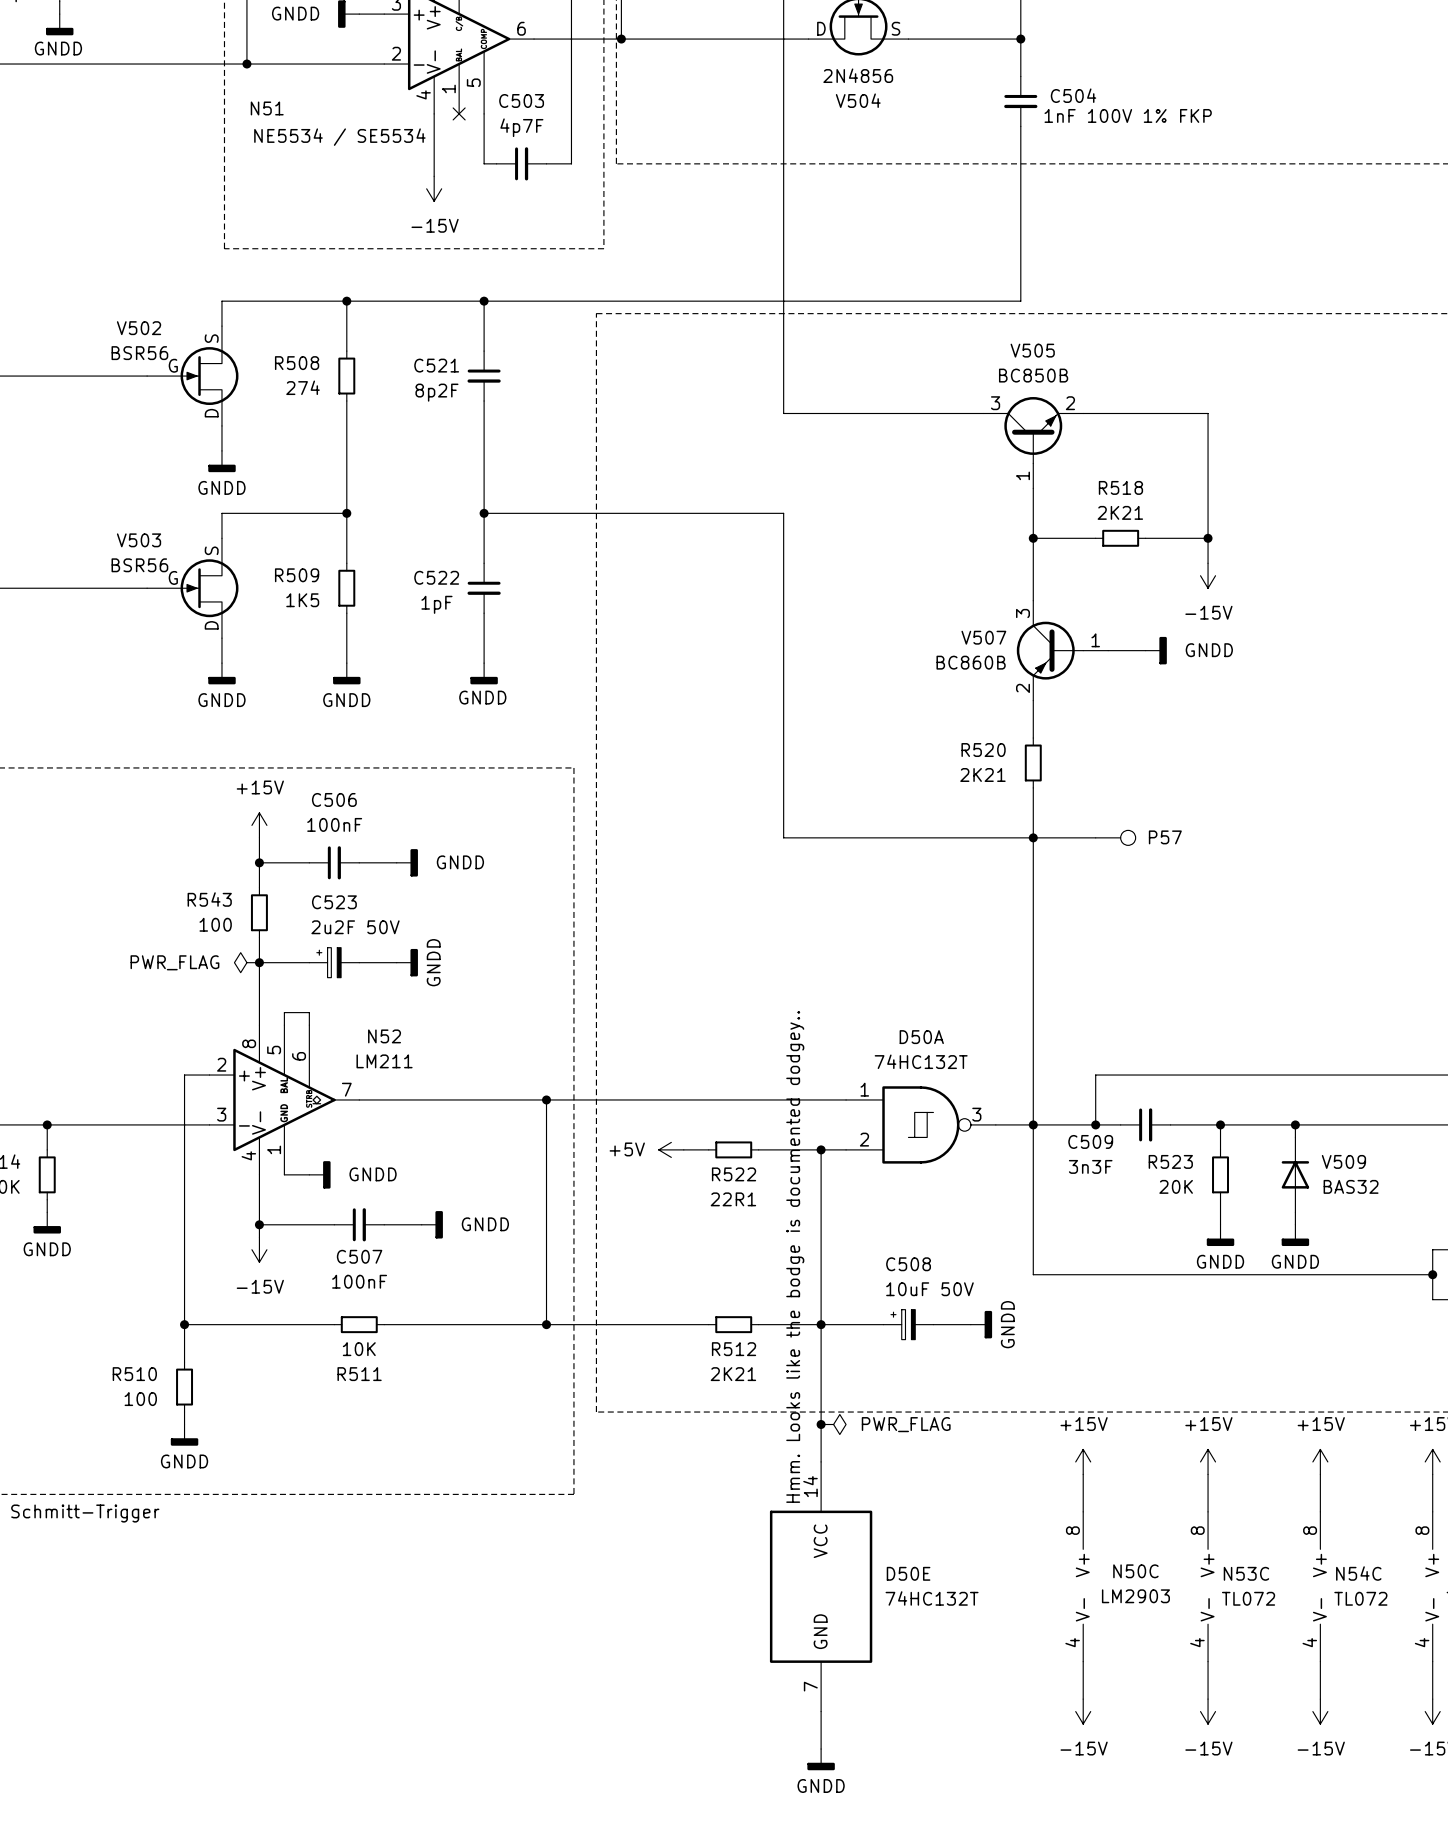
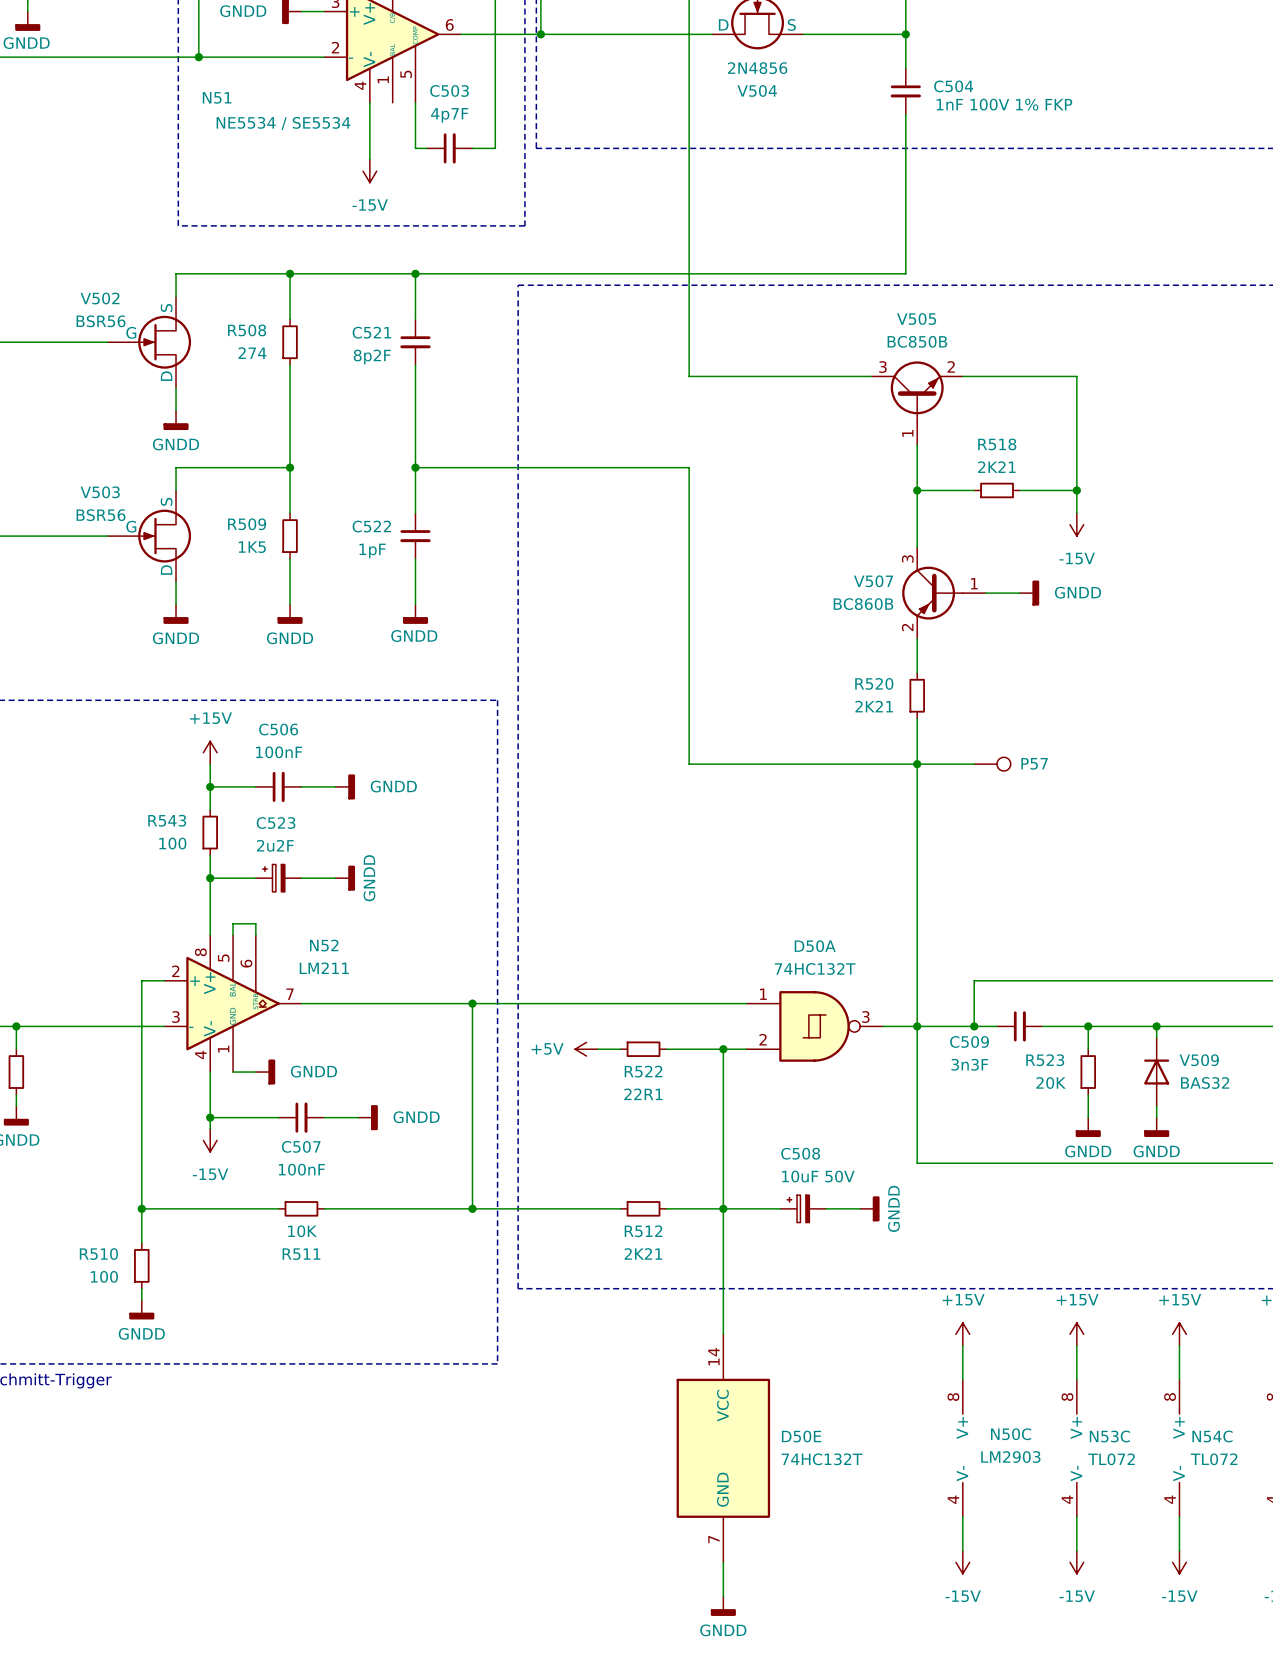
no-connect mark: (459, 113) -> none
C523 value: 2u2F 50V (355, 927) -> 2u2F (275, 845)
power symbol: PWR_FLAG (246, 962) -> none
text: Hmm. Looks like the bodge is documented dodgey.. (795, 1256) -> none
junction: (821, 1424) -> none
power symbol: PWR_FLAG (833, 1424) -> none

